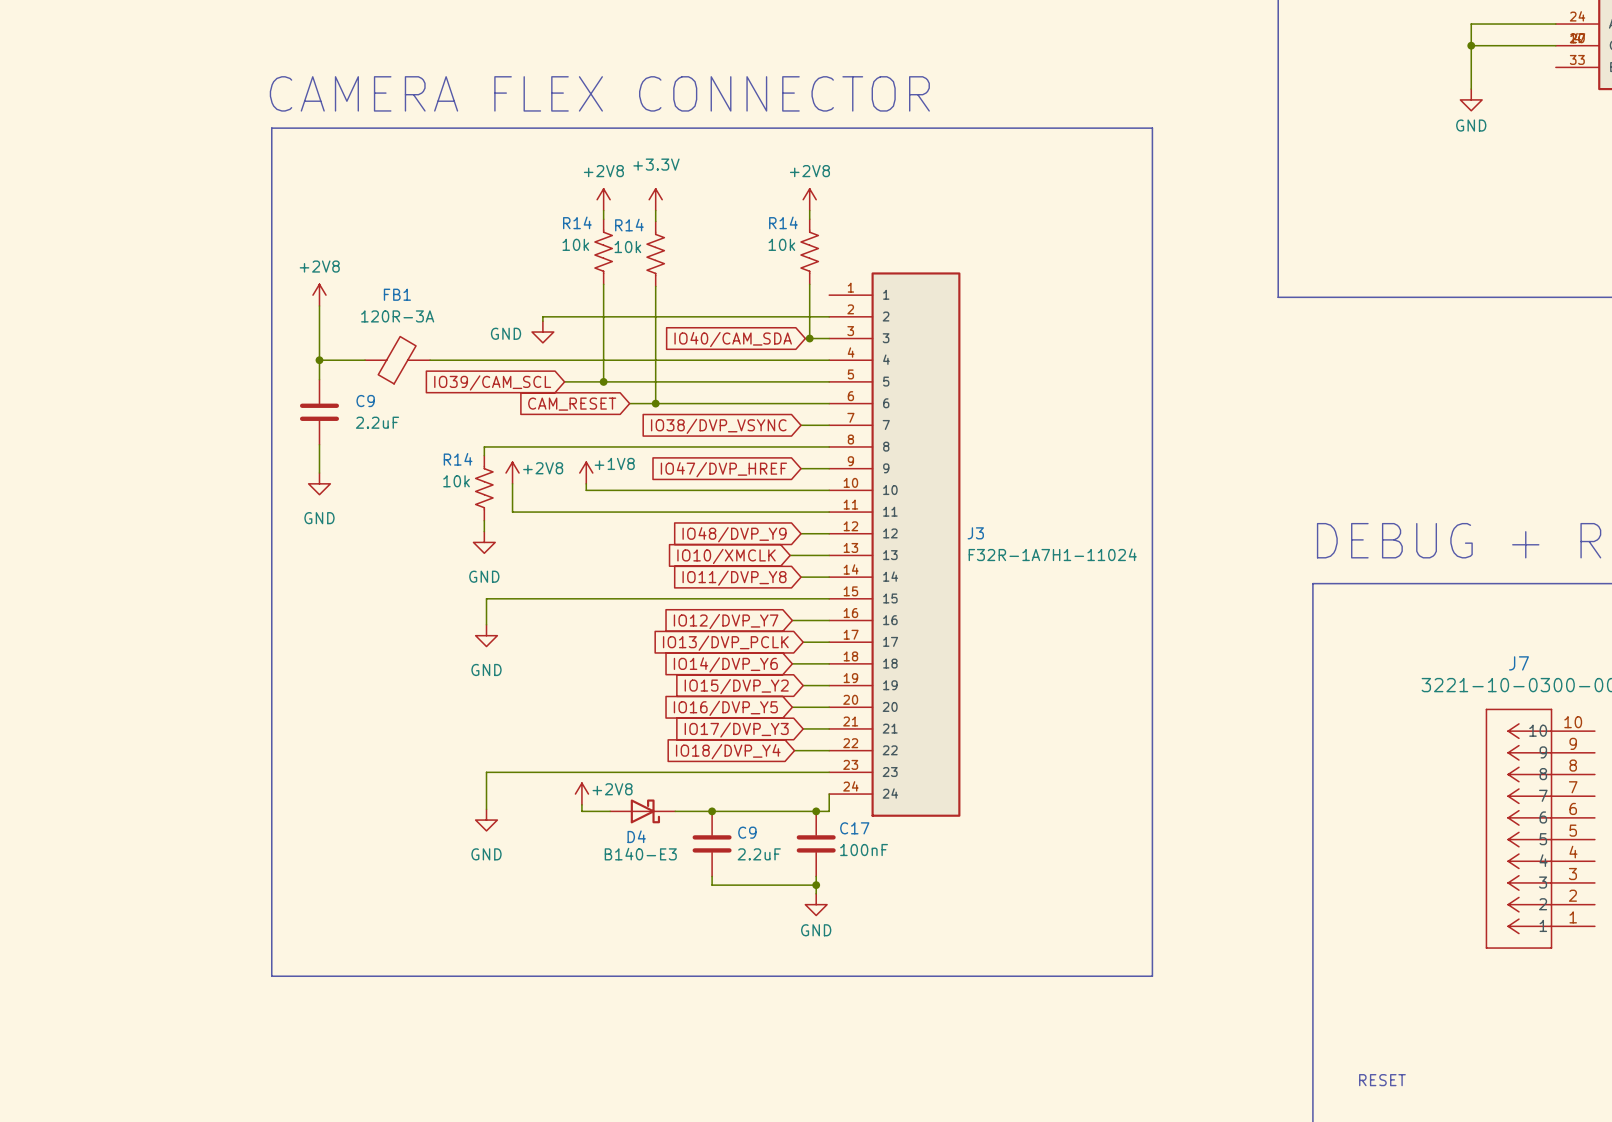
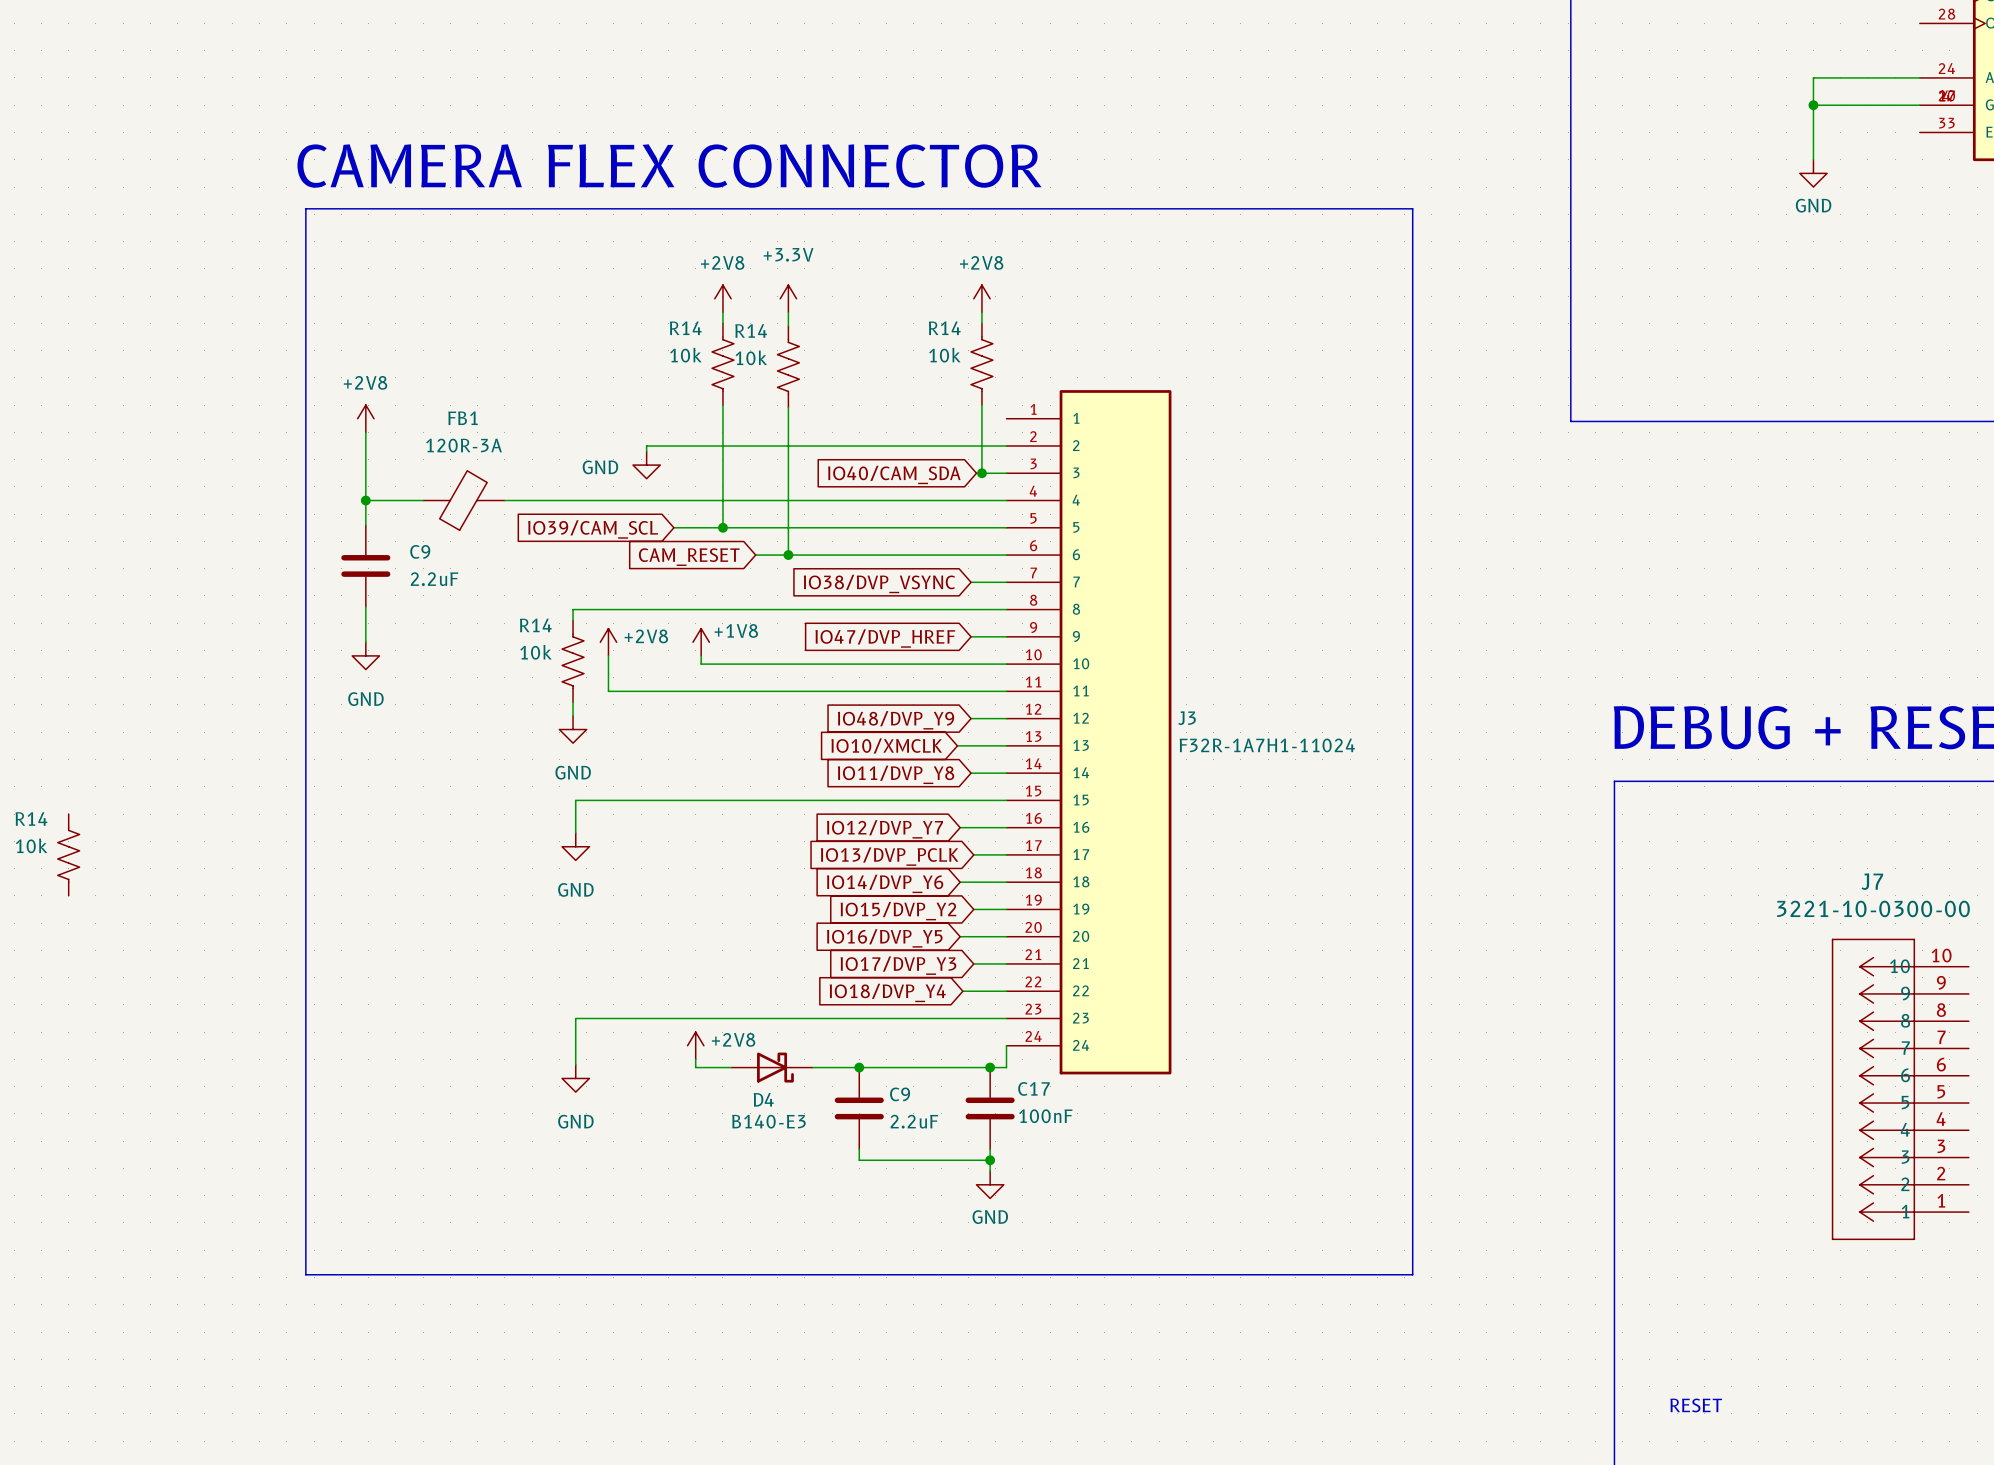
R14: none -> 10k (68, 854)

